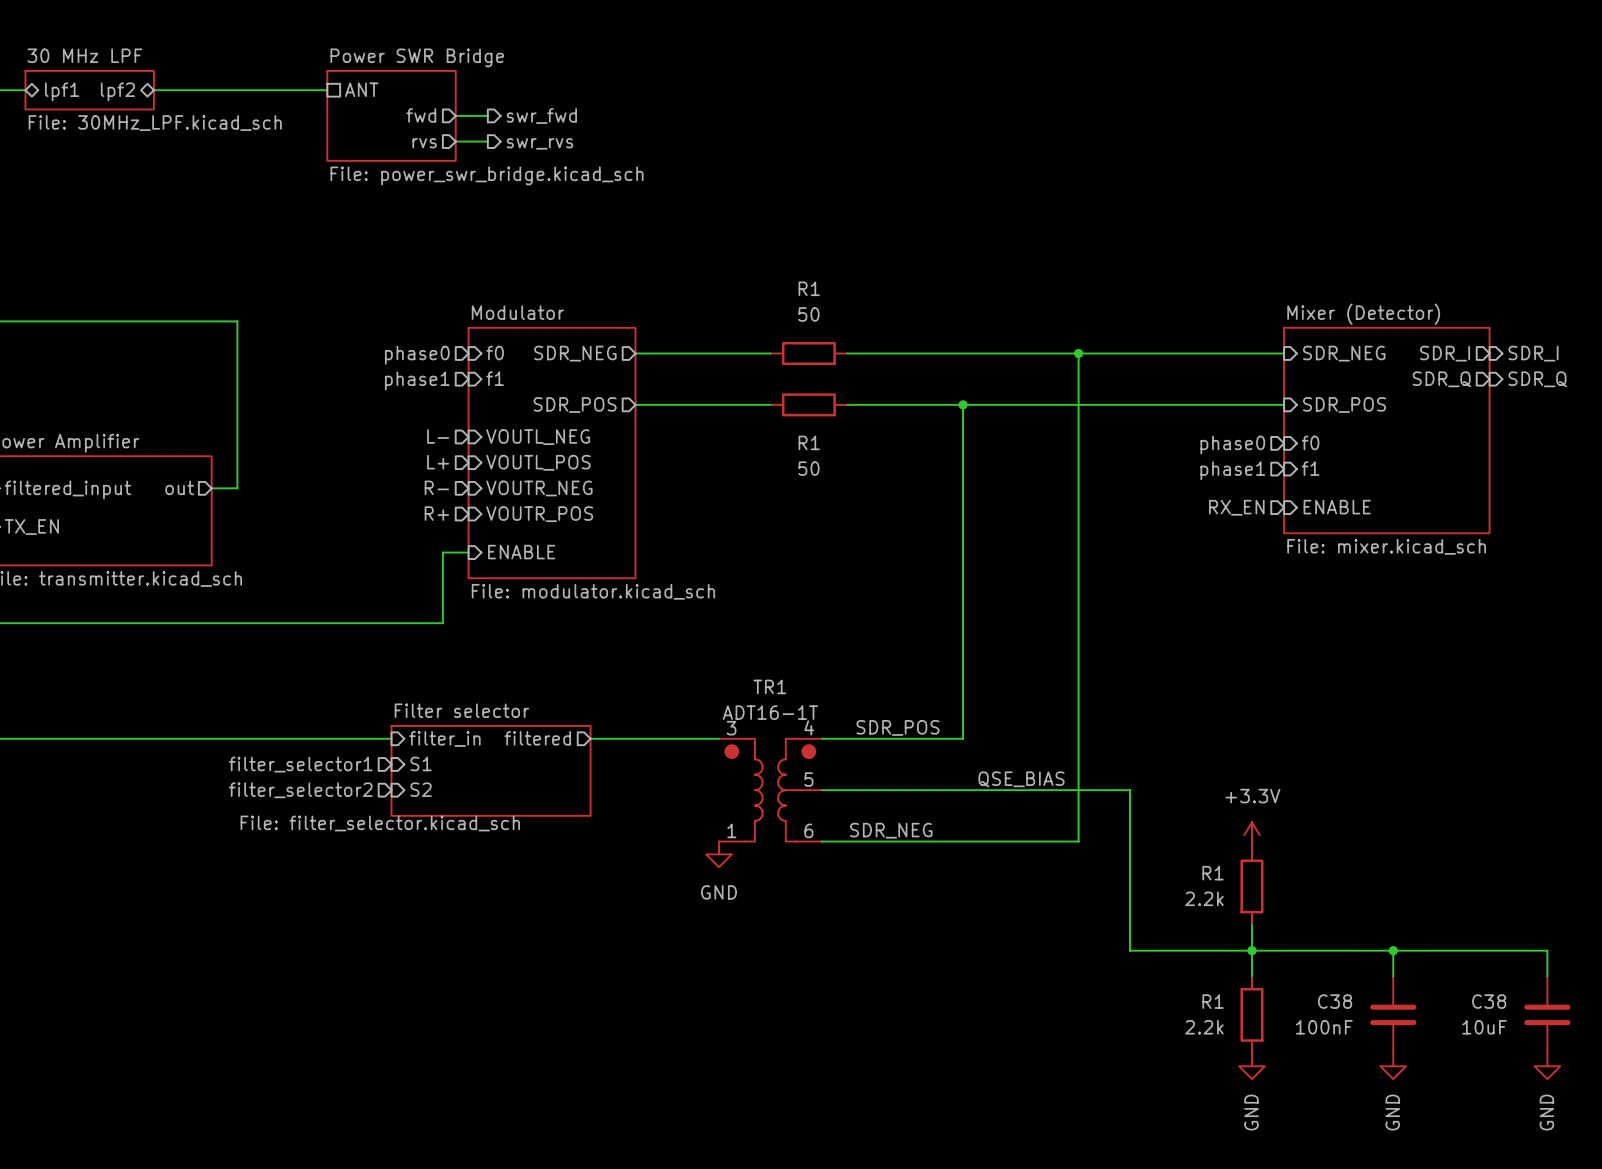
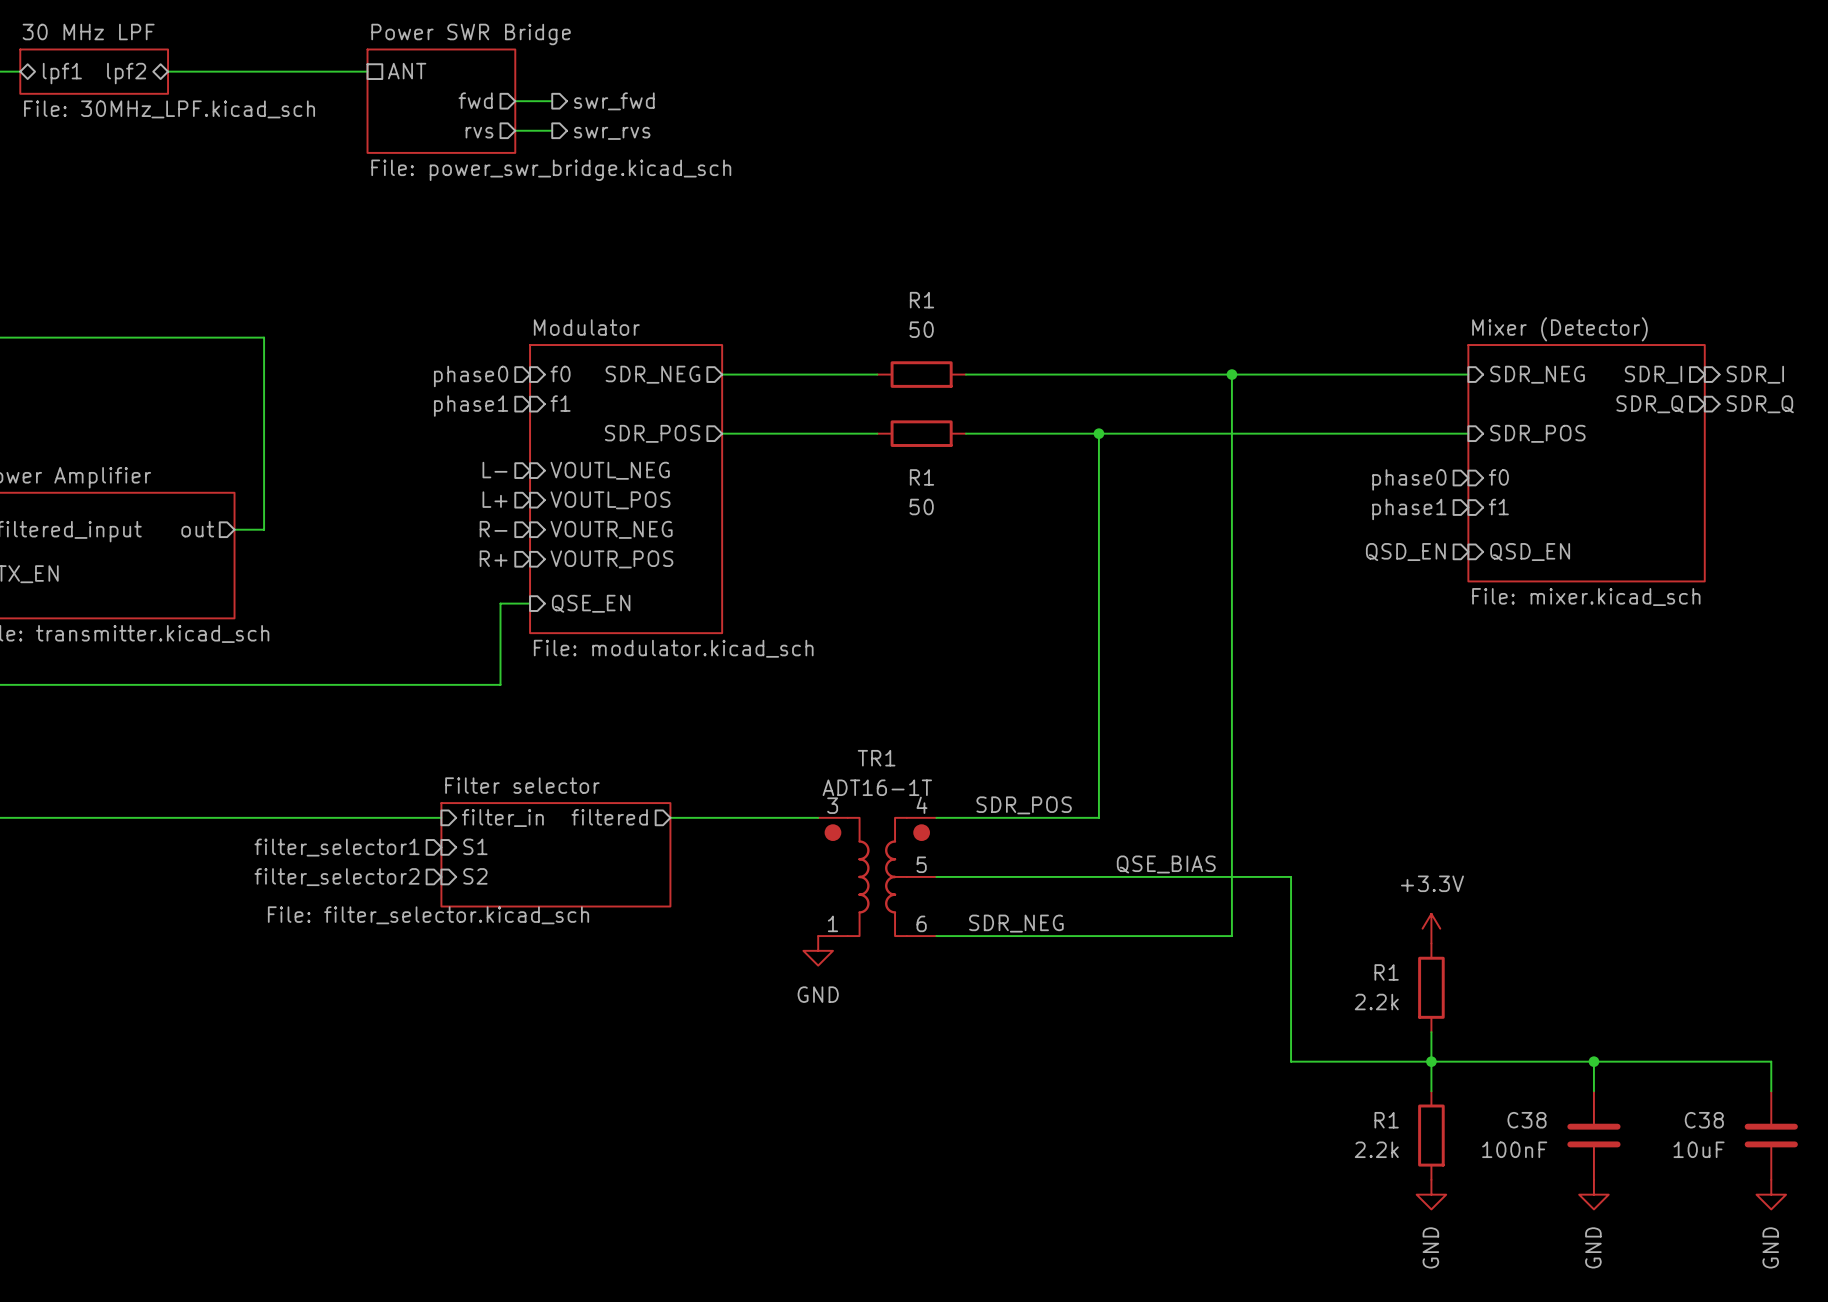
hierarchical label: RX_EN (1236, 507) -> QSD_EN (1405, 552)
sheet pin: ENABLE (1337, 507) -> QSD_EN (1530, 552)
sheet pin: ENABLE (521, 552) -> QSE_EN (591, 603)

